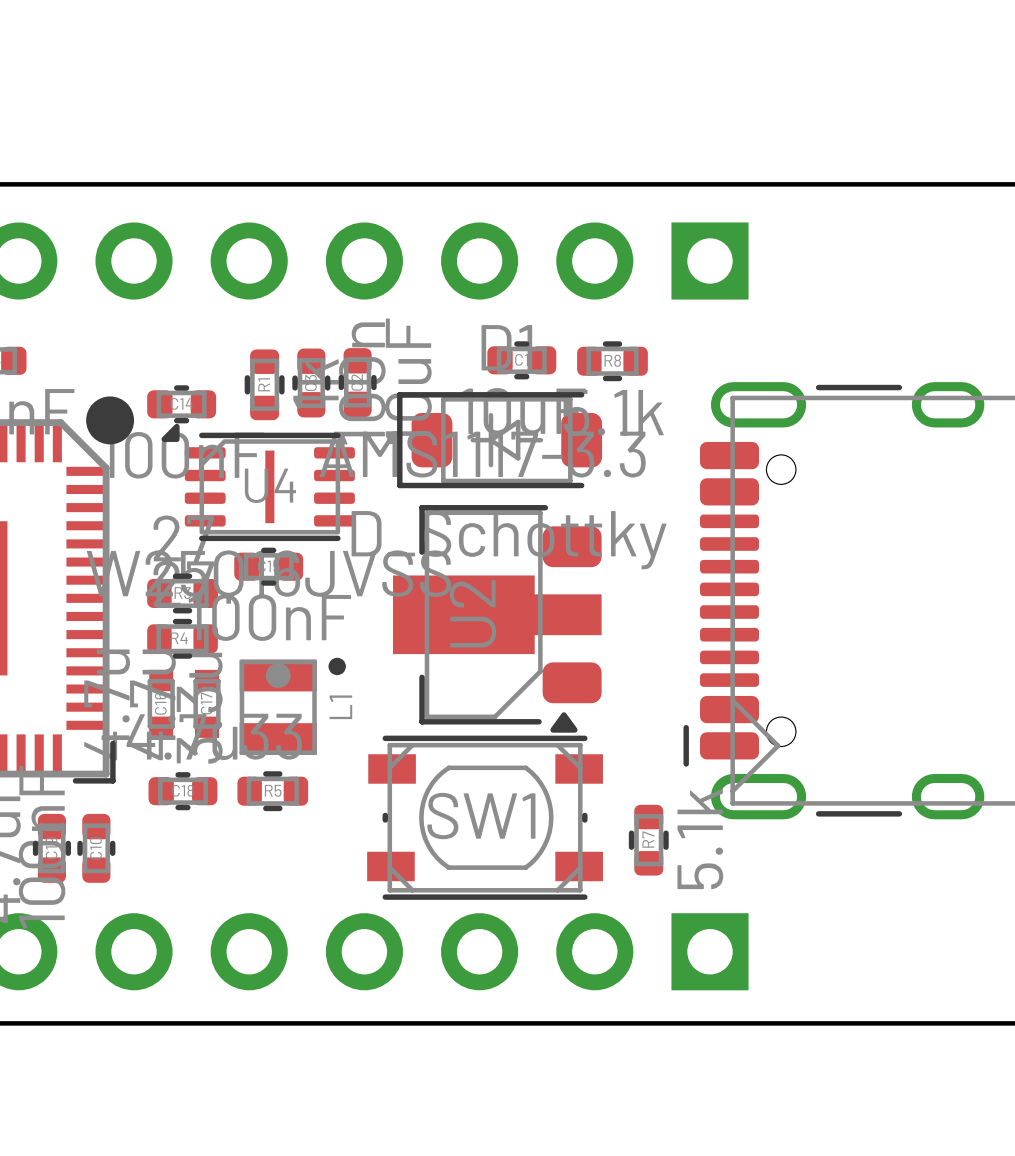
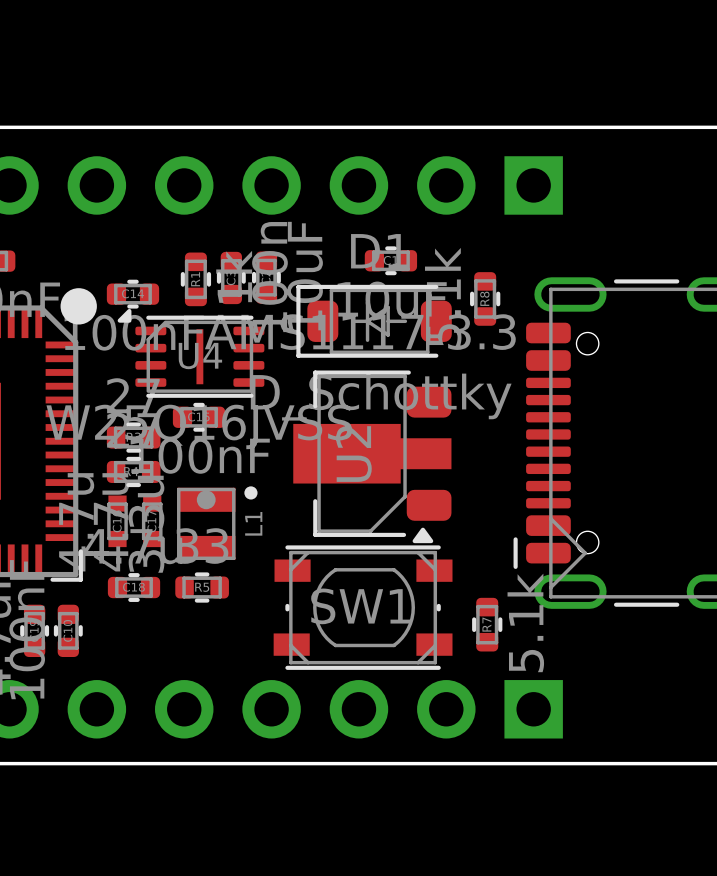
R8 rotation: 0° (612, 361) -> 90° clockwise (485, 298)
R8 position: (612, 361) -> (485, 298)

